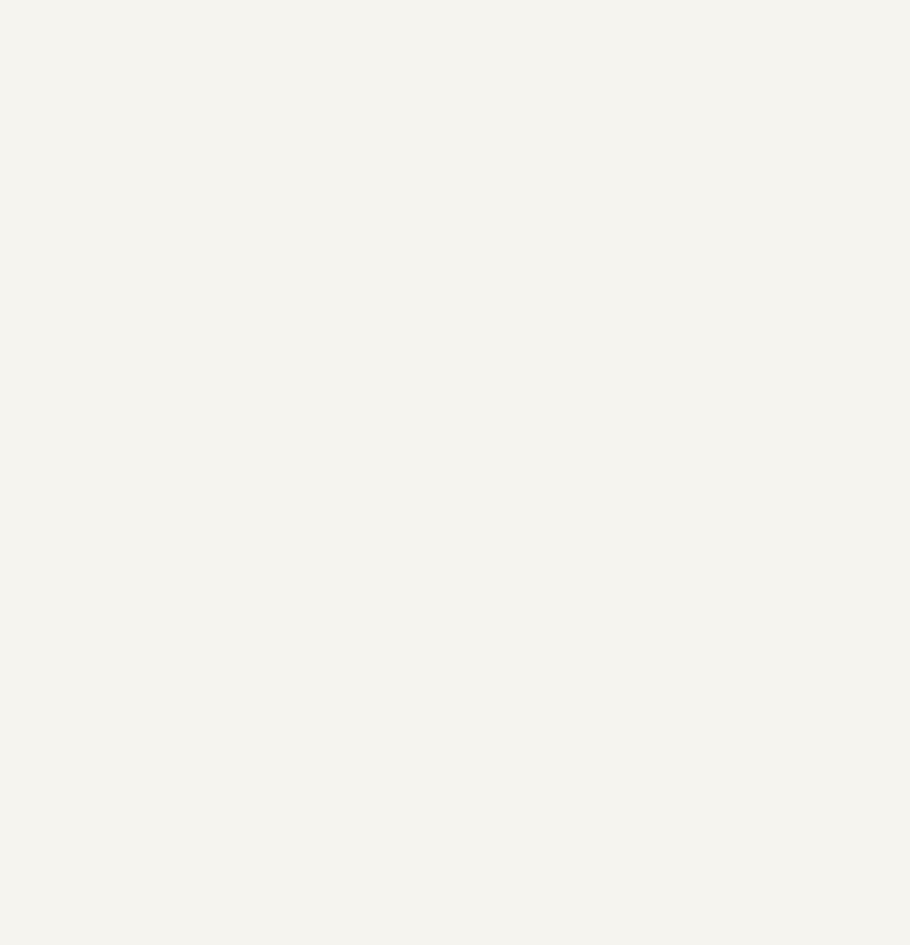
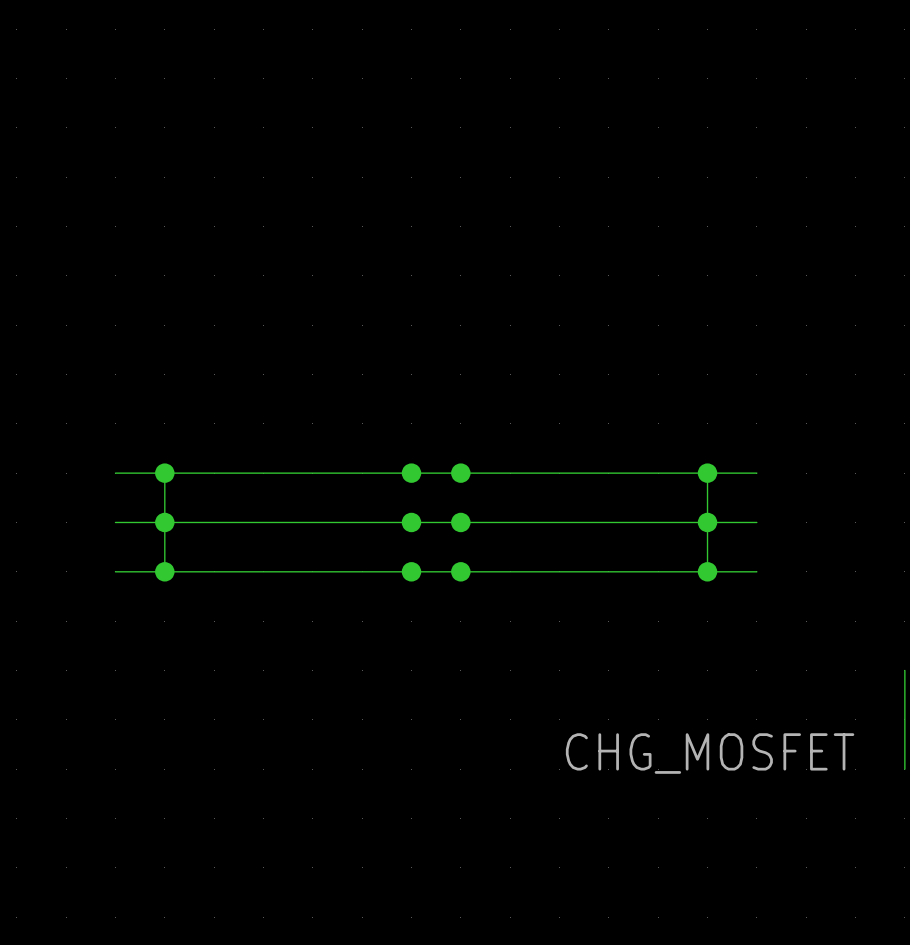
wire: none -> (115, 473) (756, 473)
wire: none -> (164, 473) (164, 571)
junction: none -> (164, 473)
junction: none -> (411, 473)
junction: none -> (460, 473)
wire: none -> (707, 473) (707, 571)
junction: none -> (707, 473)
wire: none -> (115, 522) (756, 522)
junction: none -> (164, 522)
junction: none -> (411, 522)
junction: none -> (460, 522)
junction: none -> (707, 522)
wire: none -> (115, 571) (756, 571)
junction: none -> (164, 571)
junction: none -> (411, 571)
junction: none -> (460, 571)
junction: none -> (707, 571)
wire: none -> (904, 670) (904, 769)
label: none -> CHG_MOSFET (710, 753)

